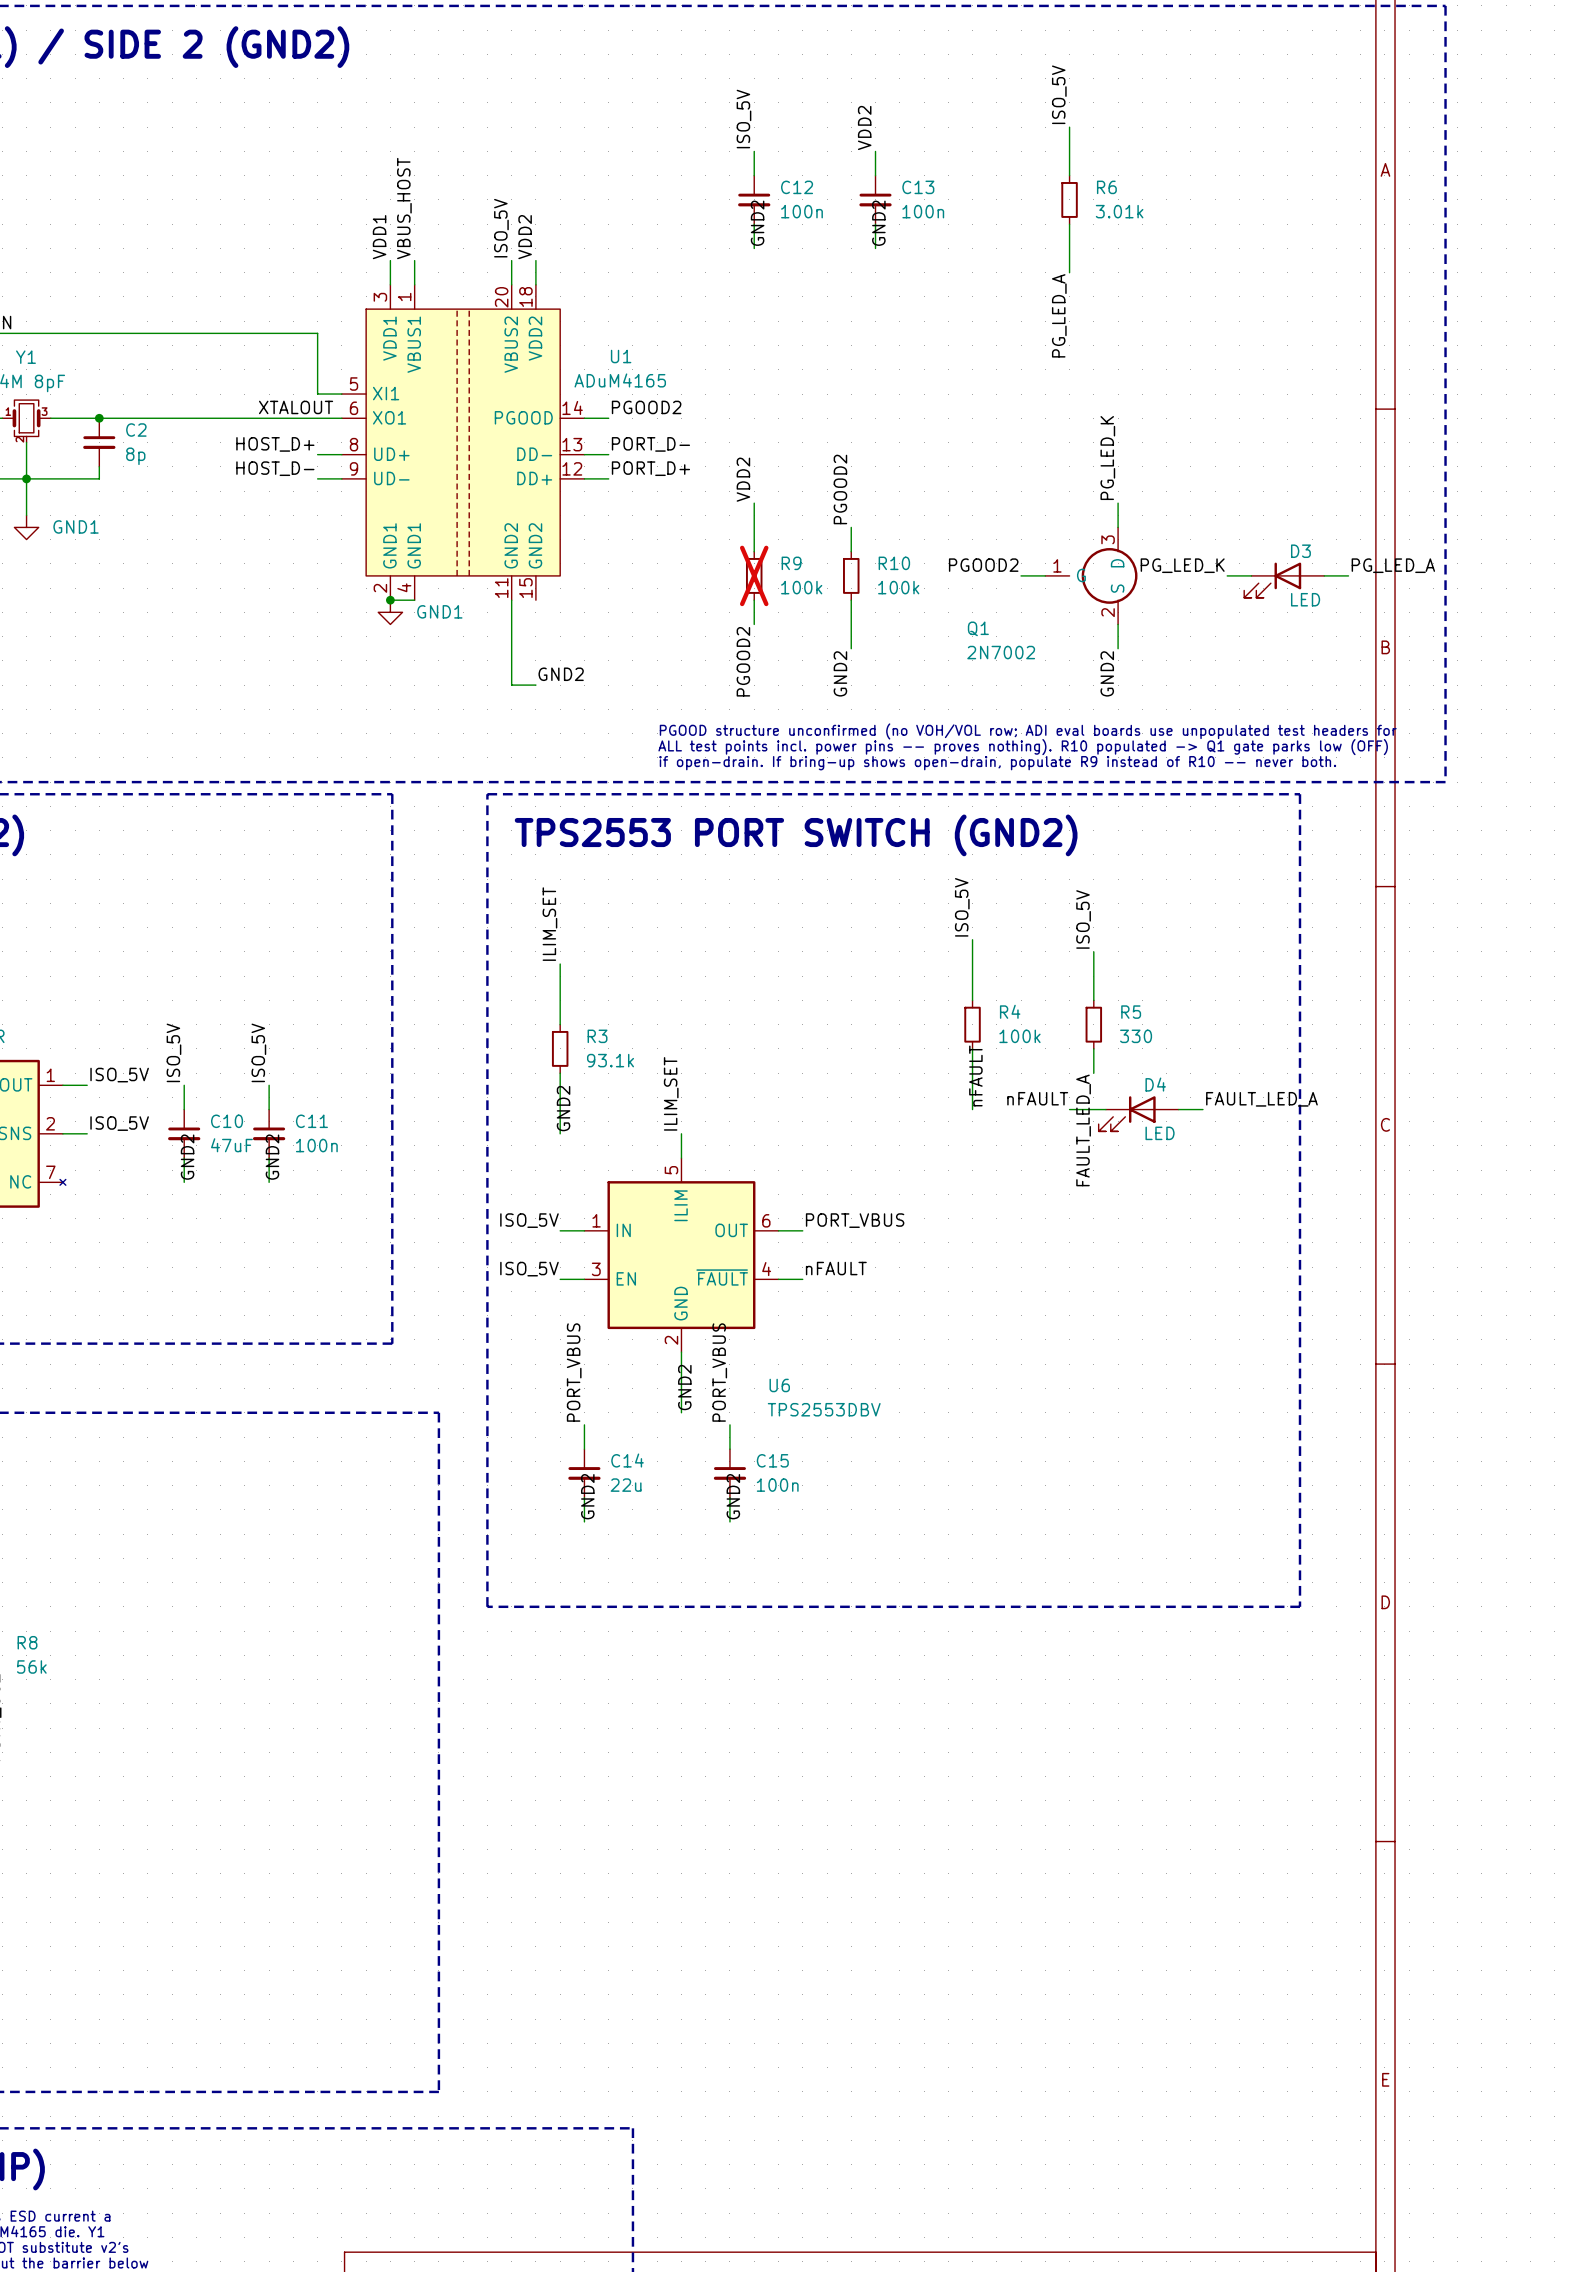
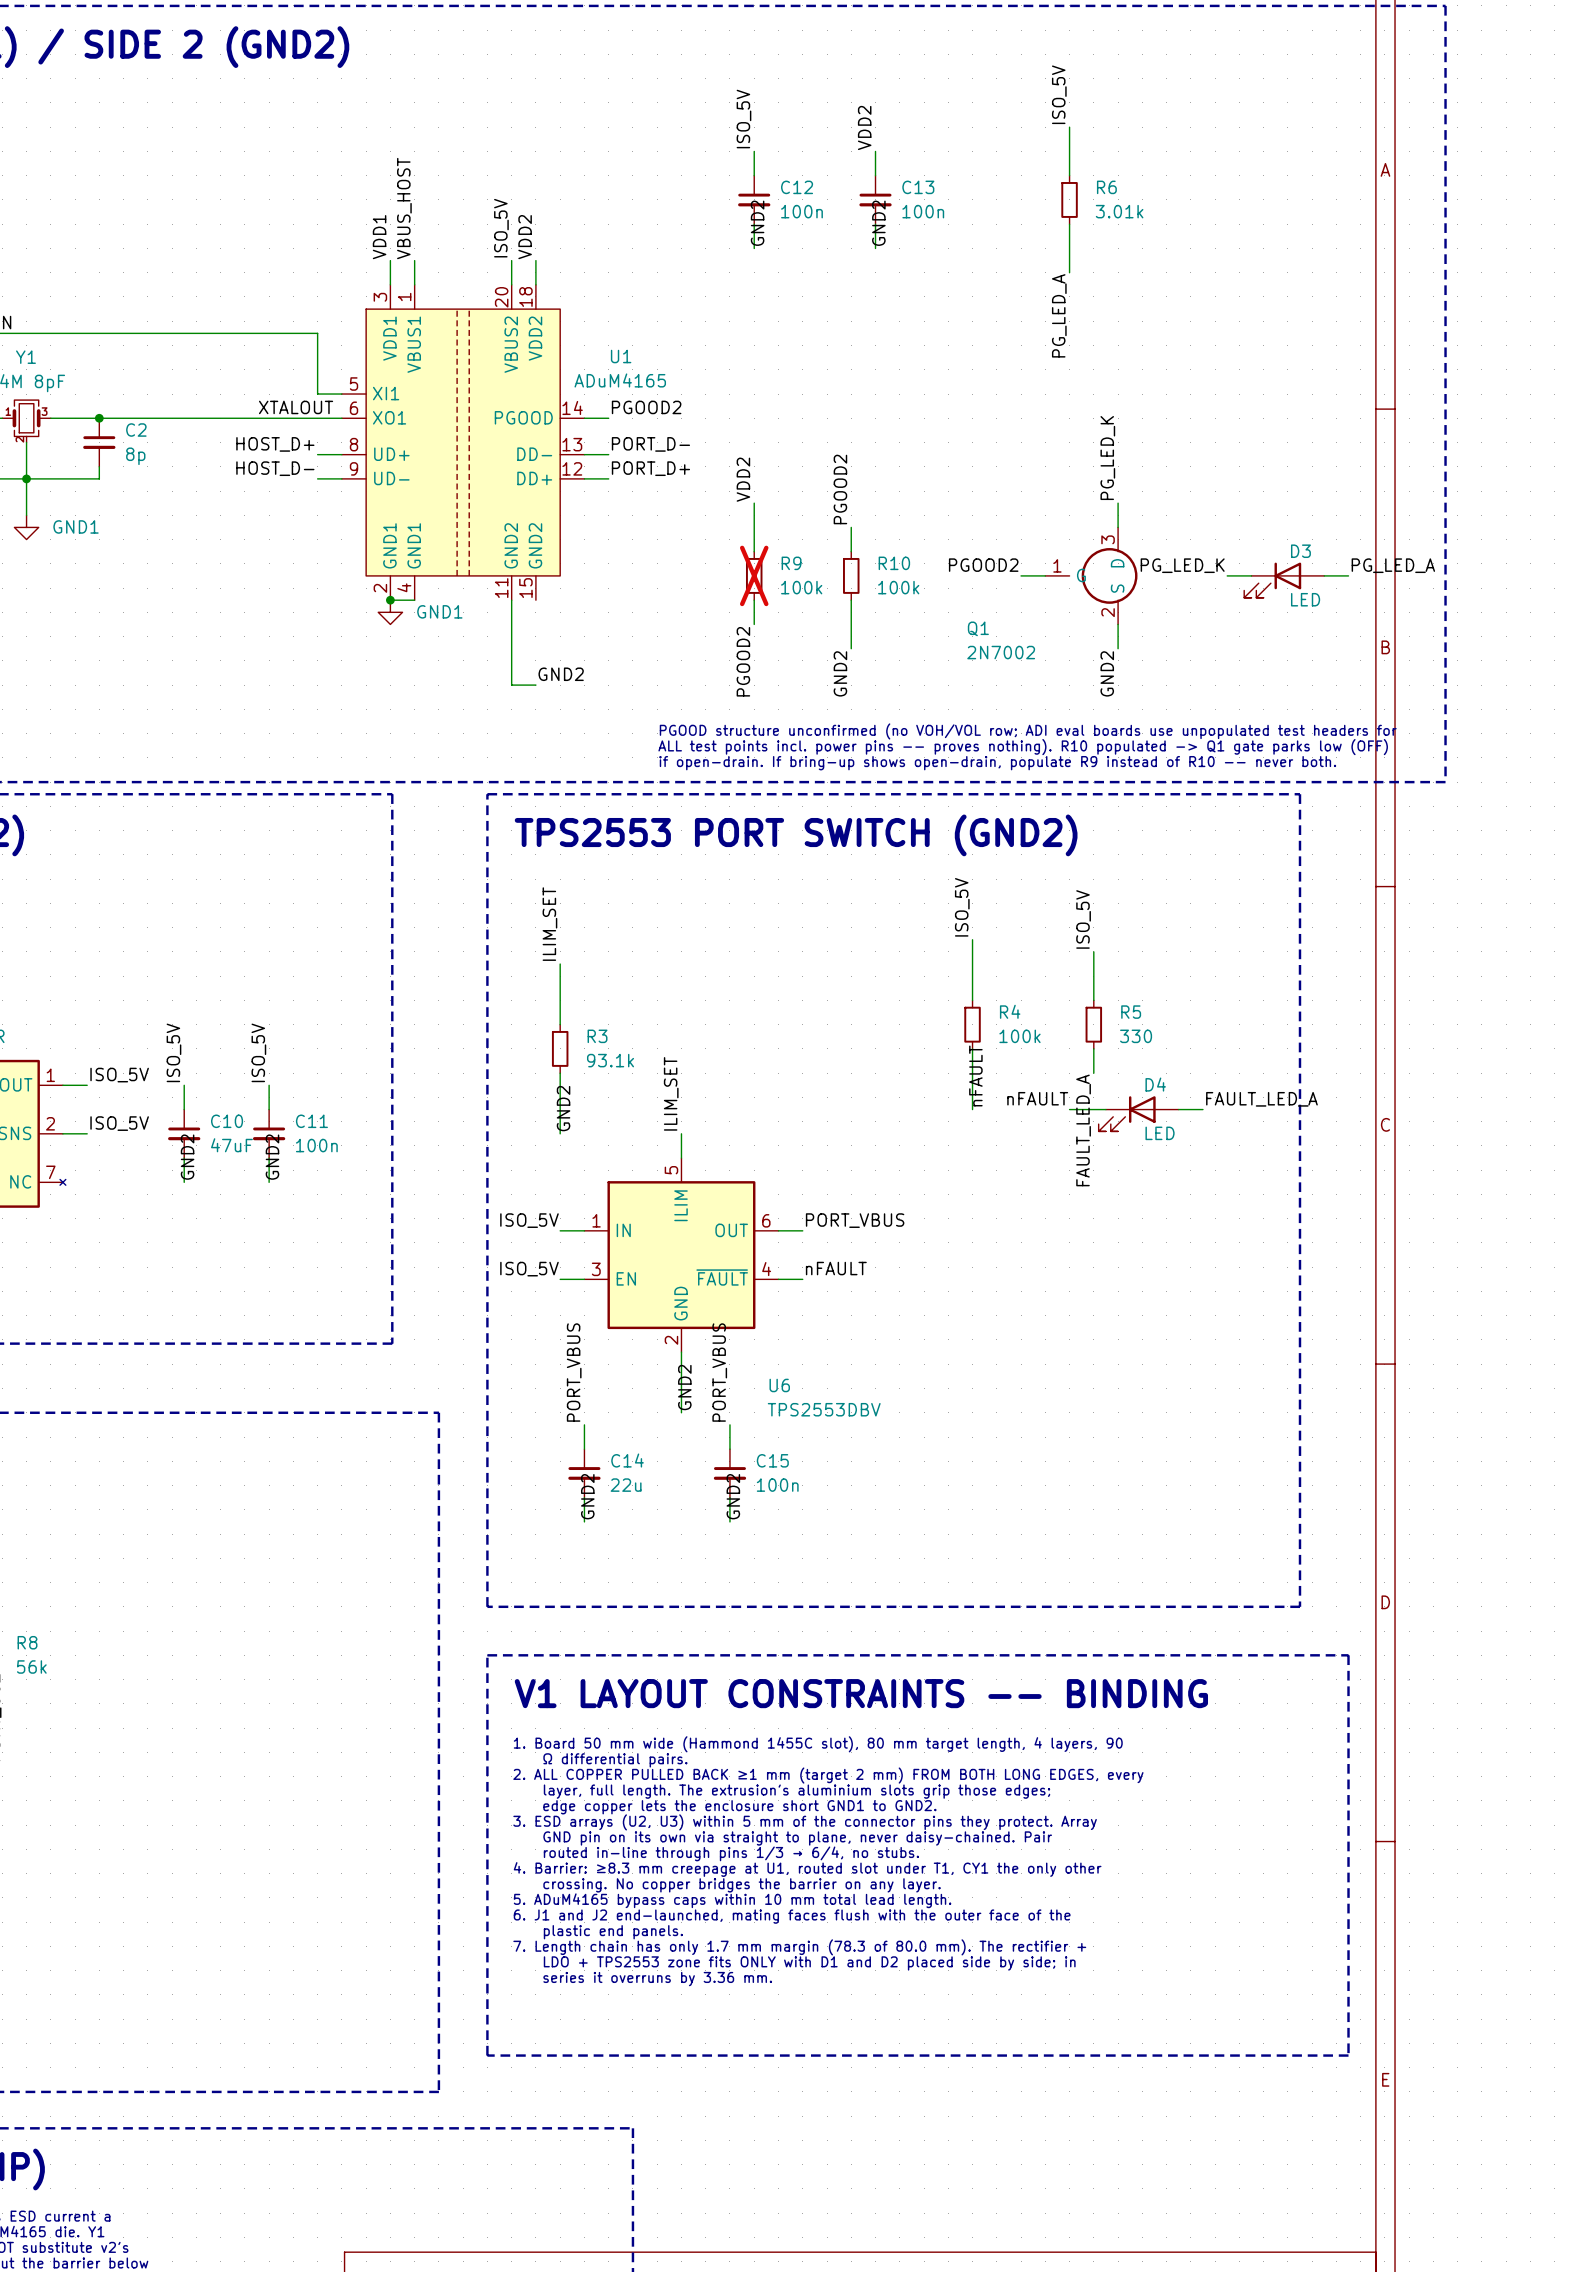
line: none -> (487, 1655) (1348, 1655) (1348, 2055) (487, 2055) (487, 1655)
text: none -> V1 LAYOUT CONSTRAINTS -- BINDING (861, 1693)
text: none -> 1. Board 50 mm wide (Hammond 1455C slot), 80 mm target length, 4 layers, 90 (818, 1744)
text: none -> Ω differential pairs. (615, 1760)
text: none -> 2. ALL COPPER PULLED BACK ≥1 mm (target 2 mm) FROM BOTH LONG EDGES, every (828, 1775)
text: none -> layer, full length. The extrusion's aluminium slots grip those edges; (797, 1791)
text: none -> edge copper lets the enclosure short GND1 to GND2. (739, 1807)
text: none -> 3. ESD arrays (U2, U3) within 5 mm of the connector pins they protect. Array (805, 1822)
text: none -> GND pin on its own via straight to plane, never daisy-chained. Pair (797, 1838)
text: none -> routed in-line through pins 1/3 → 6/4, no stubs. (731, 1853)
text: none -> 4. Barrier: ≥8.3 mm creepage at U1, routed slot under T1, CY1 the only other (807, 1869)
text: none -> crossing. No copper bridges the barrier on any layer. (742, 1885)
text: none -> 5. ADuM4165 bypass caps within 10 mm total lead length. (732, 1900)
text: none -> 6. J1 and J2 end-launched, mating faces flush with the outer face of the (792, 1916)
text: none -> plastic end panels. (613, 1932)
text: none -> 7. Length chain has only 1.7 mm margin (78.3 of 80.0 mm). The rectifier + (799, 1947)
text: none -> LDO + TPS2553 zone fits ONLY with D1 and D2 placed side by side; in (809, 1963)
text: none -> series it overruns by 3.36 mm. (657, 1979)

